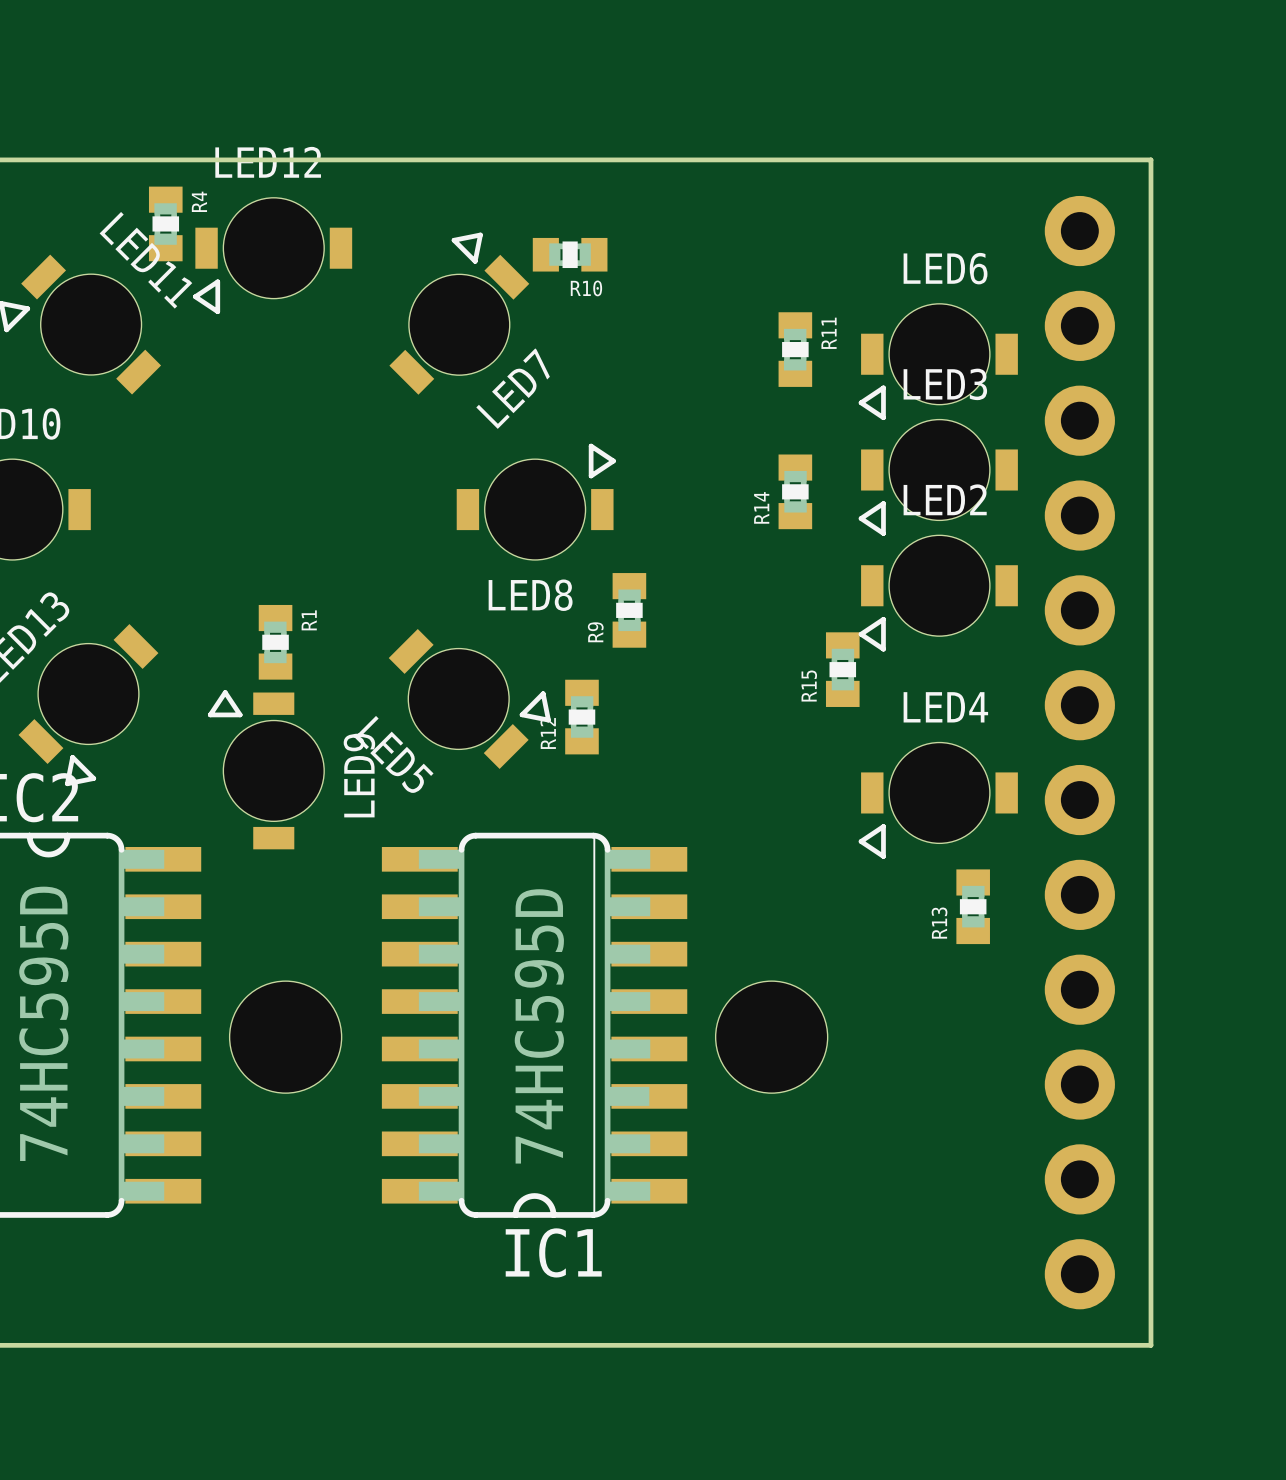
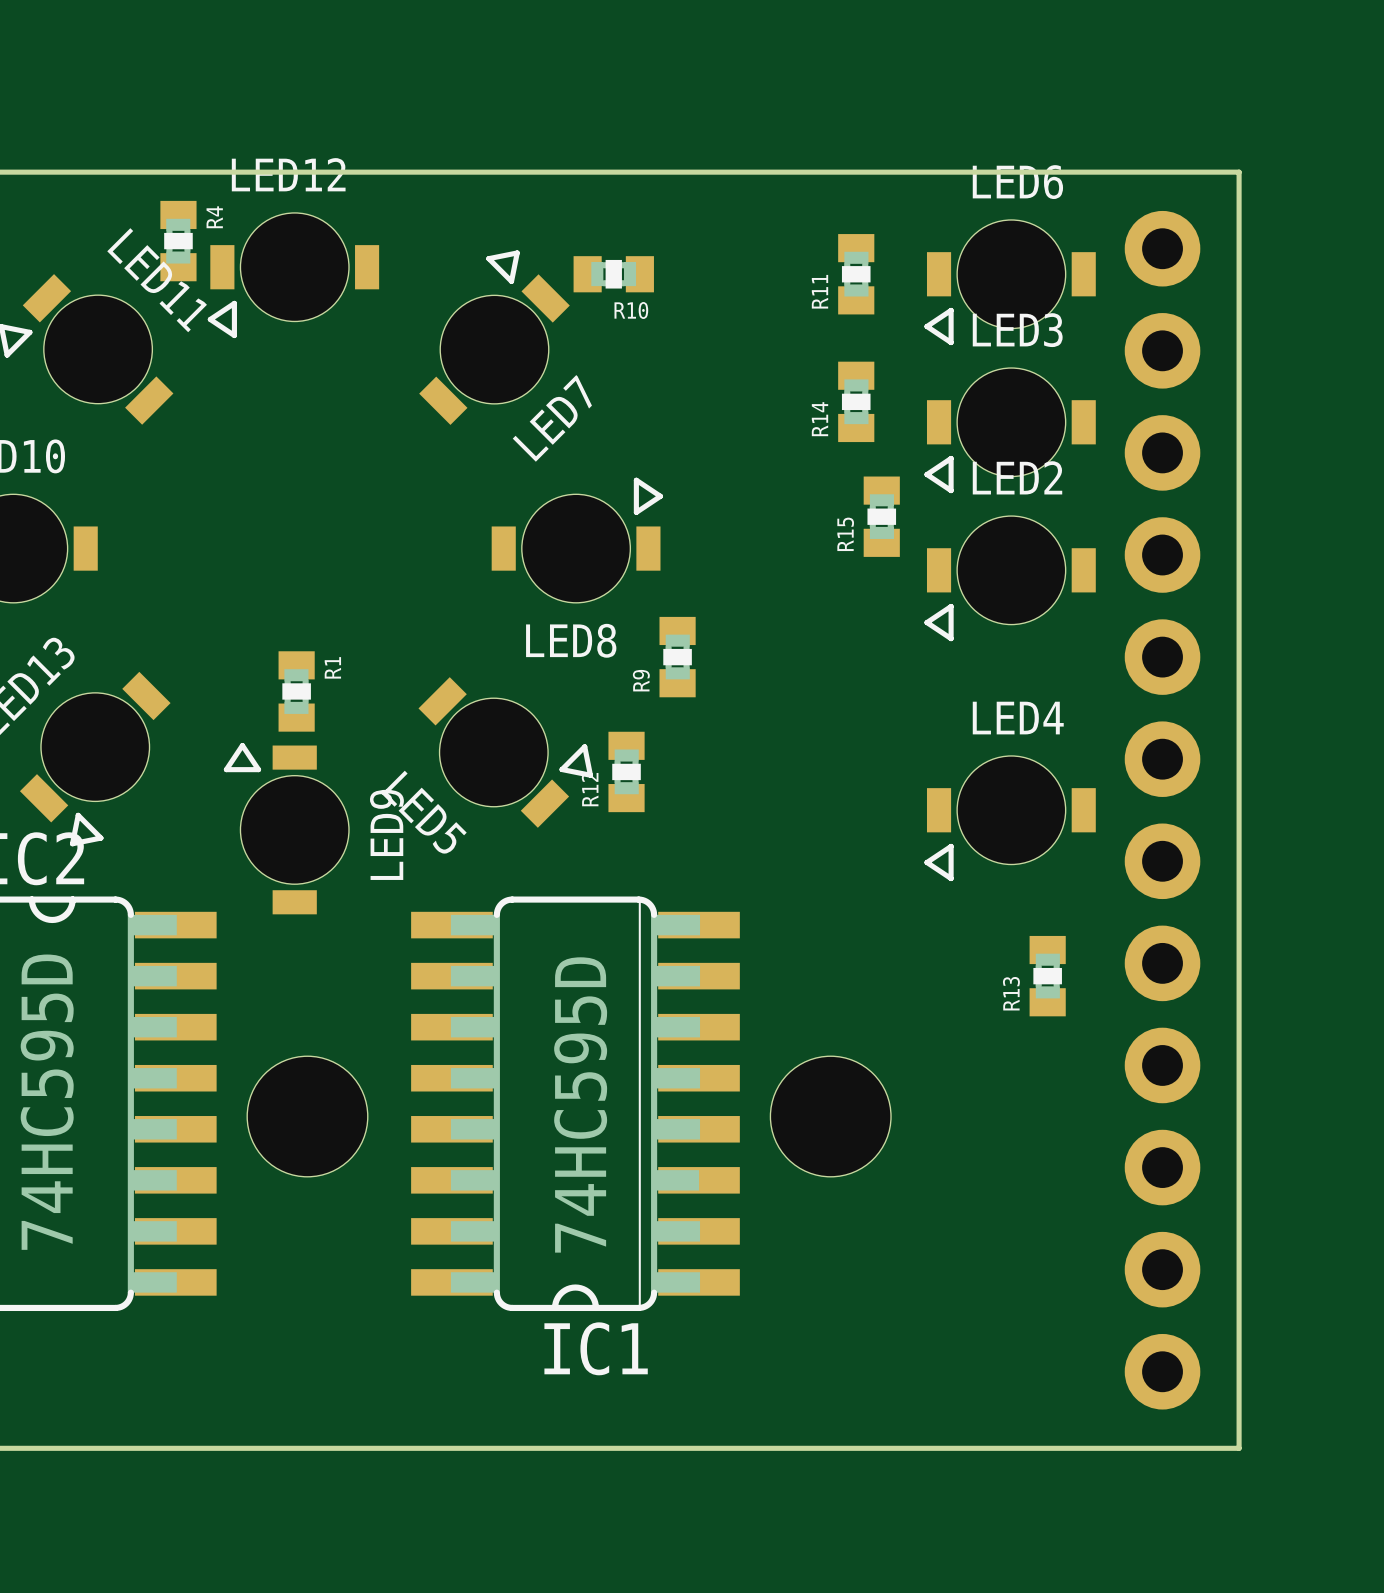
R11 name position: R11 (829, 333) -> R11 (820, 291)
R11 position: (795, 349) -> (856, 274)
LED6 position: (938, 361) -> (1010, 282)
LED3 position: (938, 477) -> (1010, 430)
R14 position: (795, 491) -> (856, 401)
LED2 position: (938, 593) -> (1010, 578)
R15 position: (842, 669) -> (881, 516)
LED4 position: (938, 800) -> (1010, 818)

